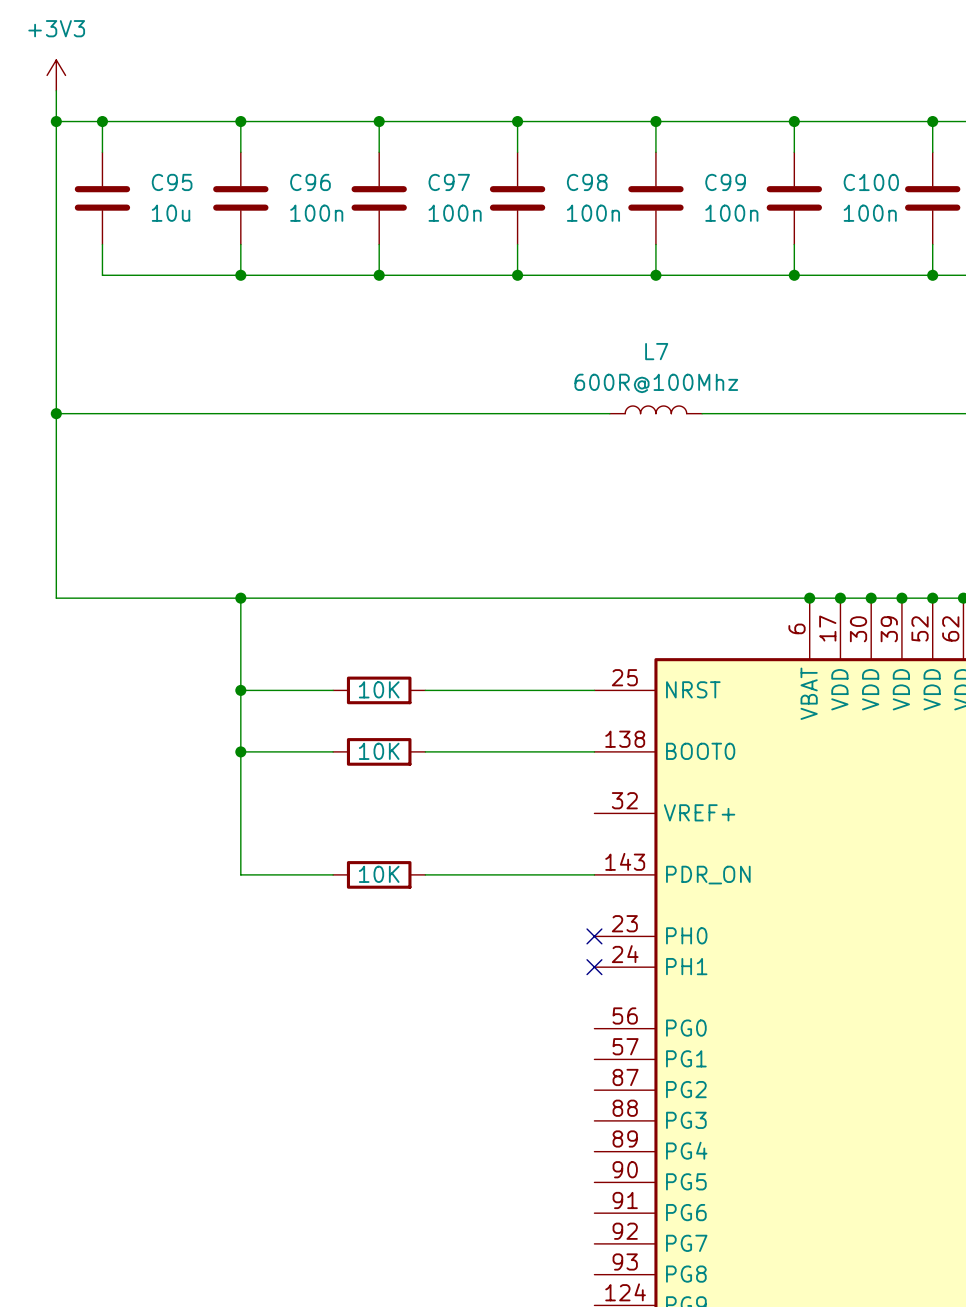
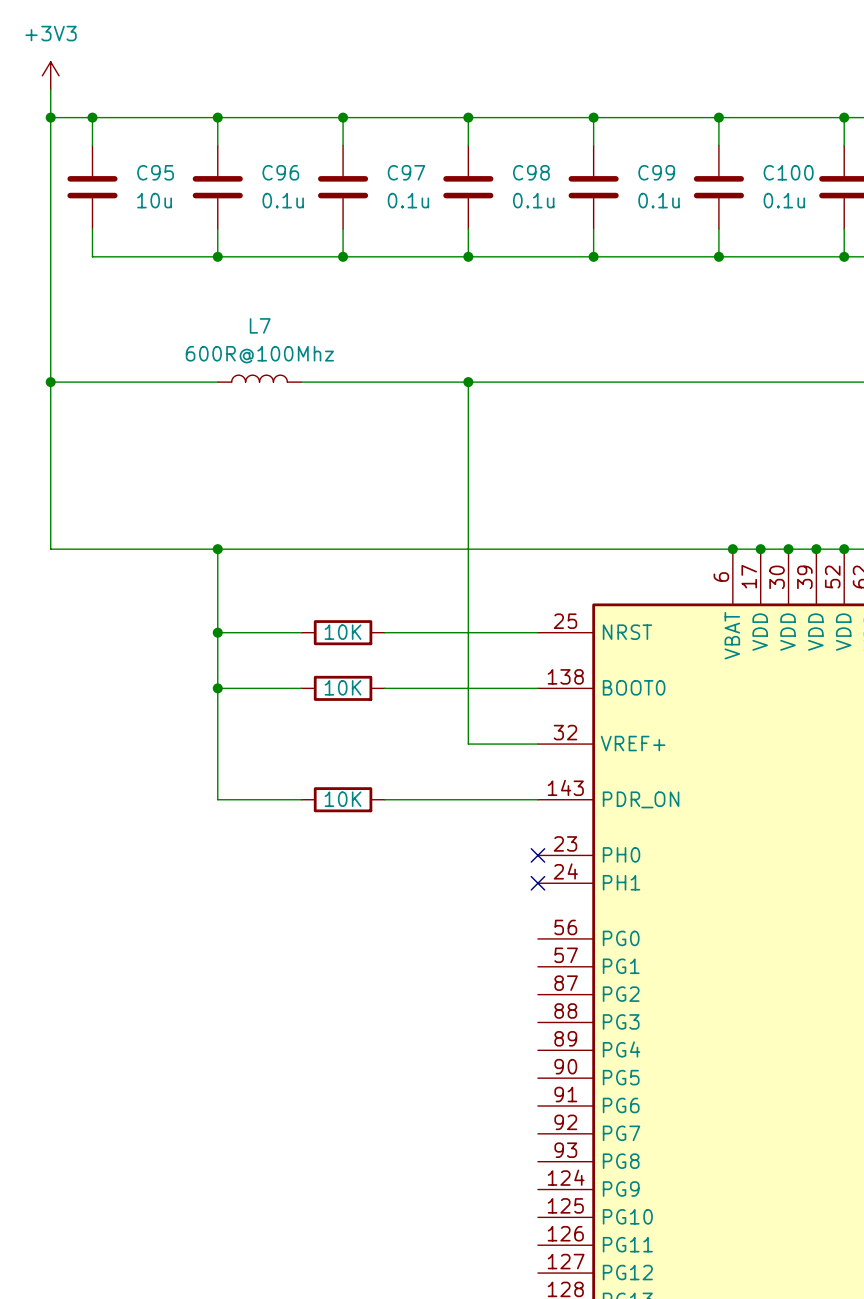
C96 value: 100n (316, 213) -> 0.1u (283, 200)
C97 value: 100n (455, 213) -> 0.1u (408, 200)
C98 value: 100n (593, 213) -> 0.1u (533, 200)
C99 value: 100n (731, 213) -> 0.1u (659, 200)
C100 value: 100n (870, 213) -> 0.1u (784, 200)
L7 position: (655, 409) -> (259, 378)
wire: (240, 413) (333, 413) -> none
wire: none -> (468, 382) (468, 744) (537, 744)
junction: none -> (468, 382)
wire: none -> (551, 382) (635, 382)

